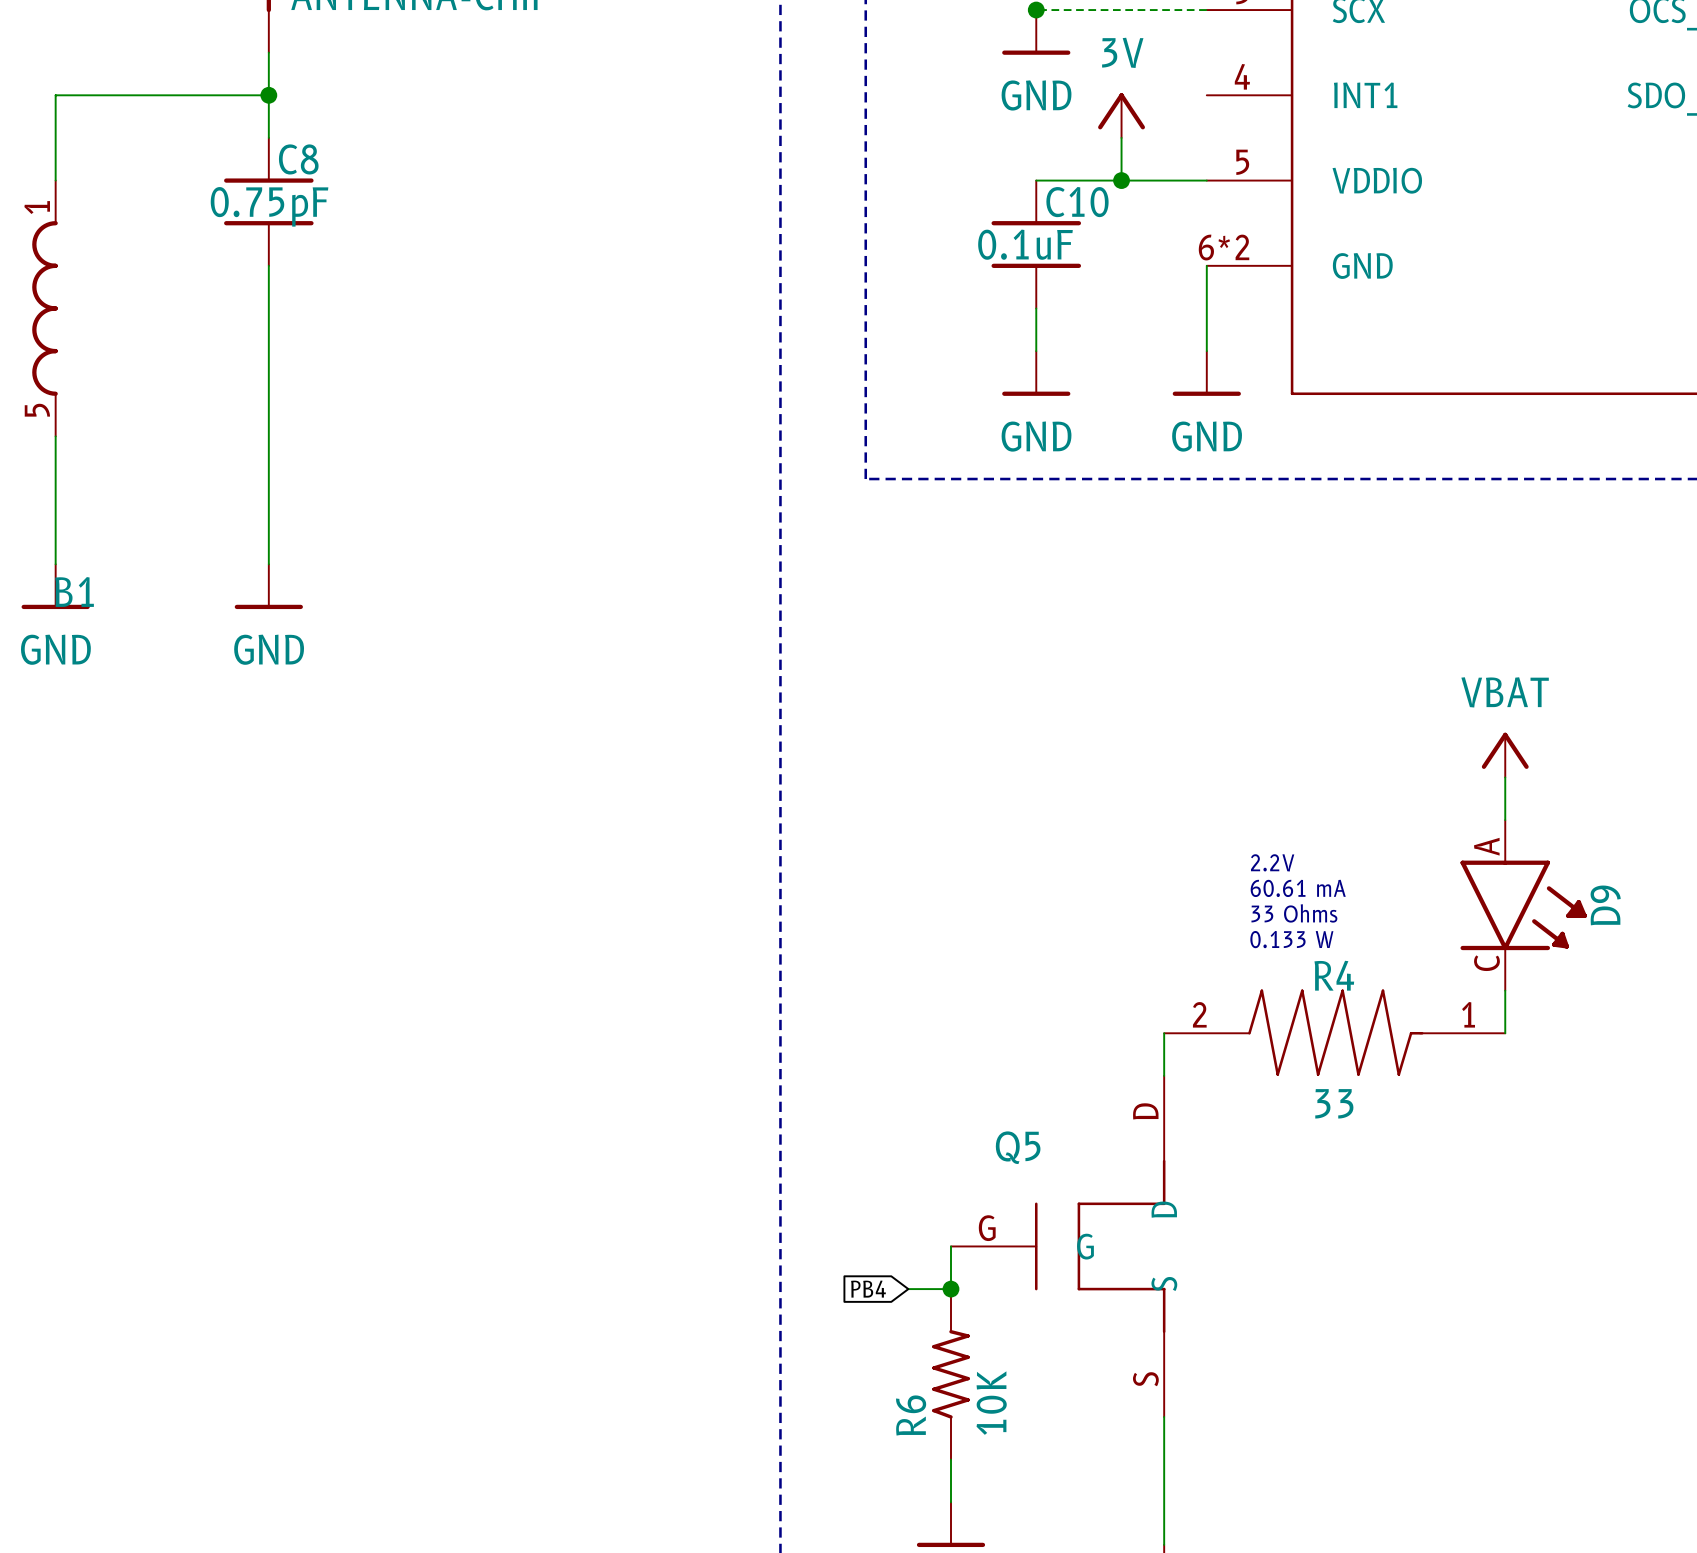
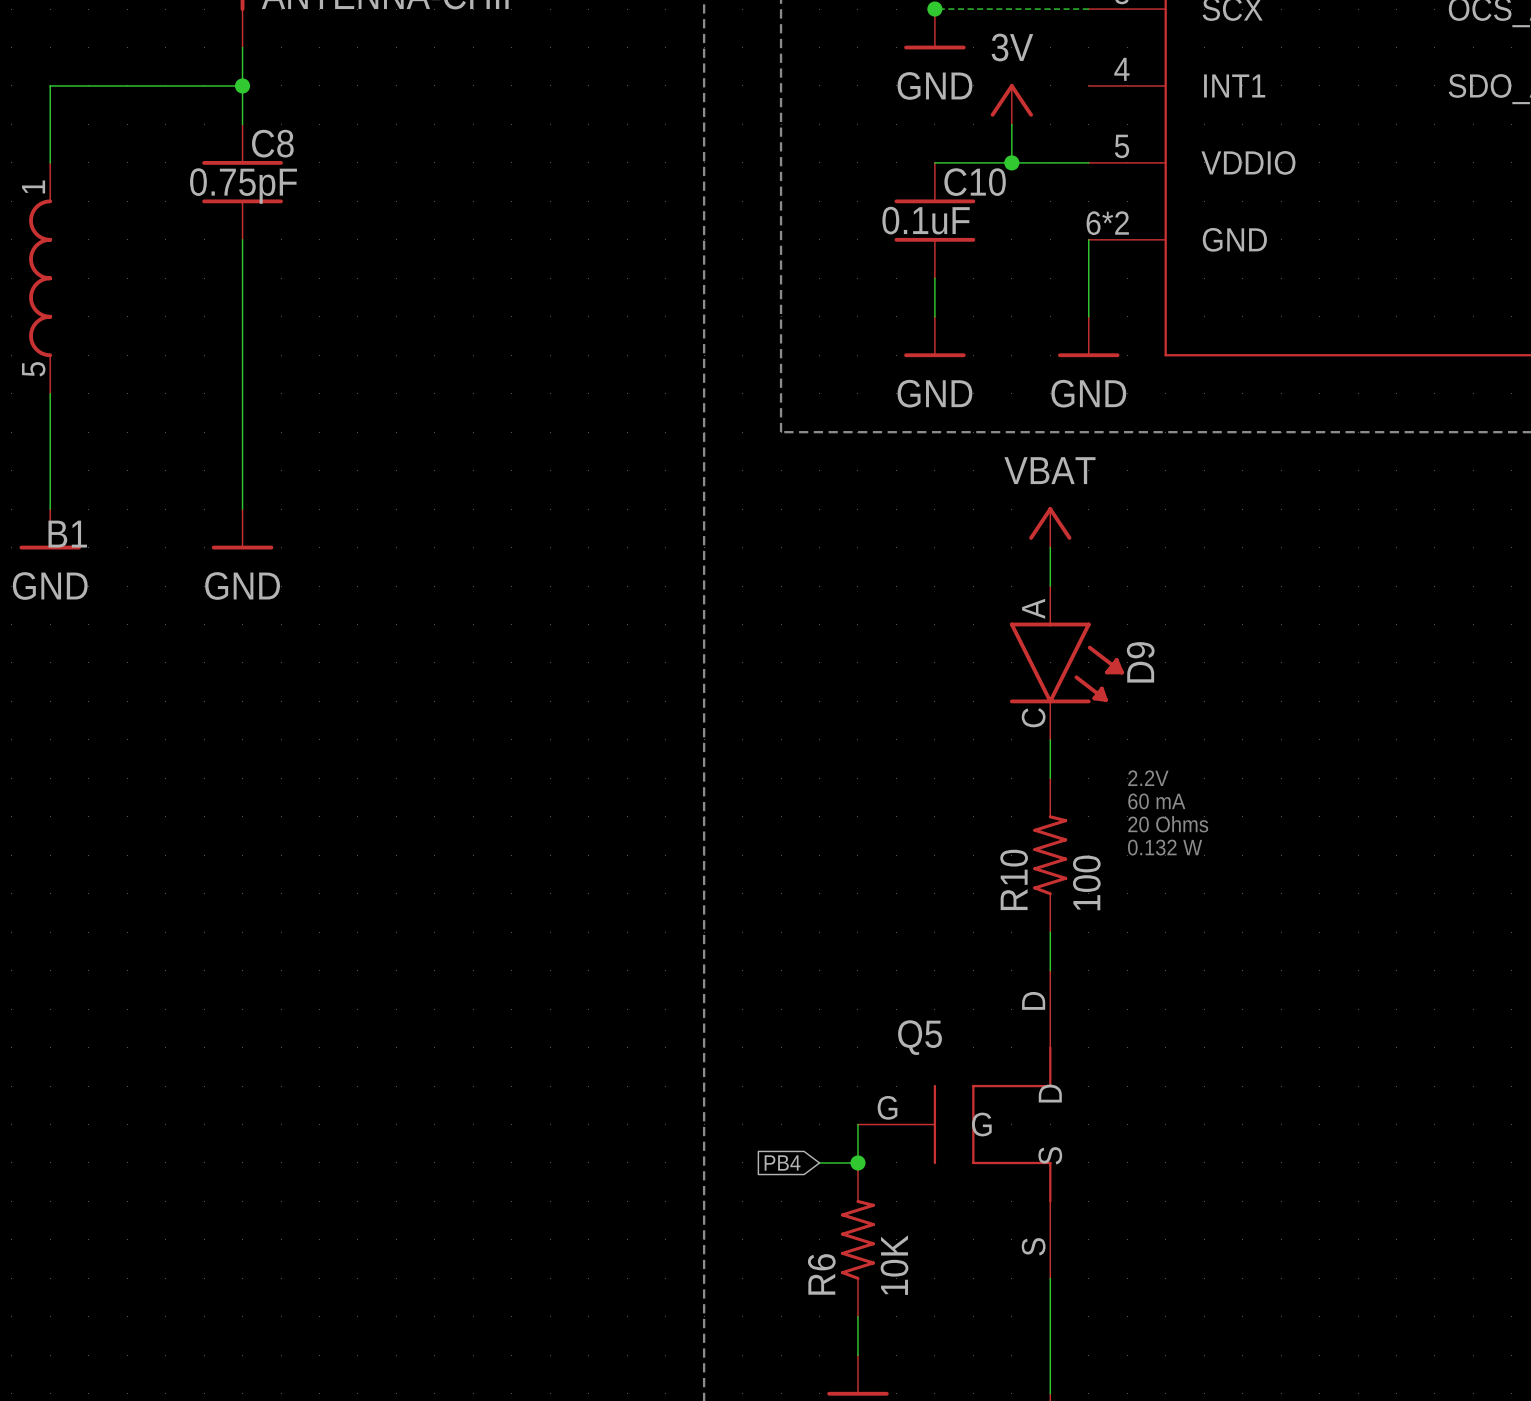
wire: none -> (1050, 547) (1050, 586)
power symbol position: VBAT (1505, 755) -> VBAT (1050, 527)
wire: (1505, 777) (1505, 820) -> (1050, 739) (1050, 778)
text: 60.61 mA (1298, 888) -> 60 mA (1156, 801)
D9 position: (1523, 905) -> (1066, 662)
text: 33 Ohms (1294, 913) -> 20 Ohms (1168, 824)
text: 0.133 W (1291, 939) -> 0.132 W (1165, 847)
R10: none -> 100 (1050, 855)
wire: (1505, 990) (1505, 1033) -> none
R4: 33 (1334, 1032) -> none

